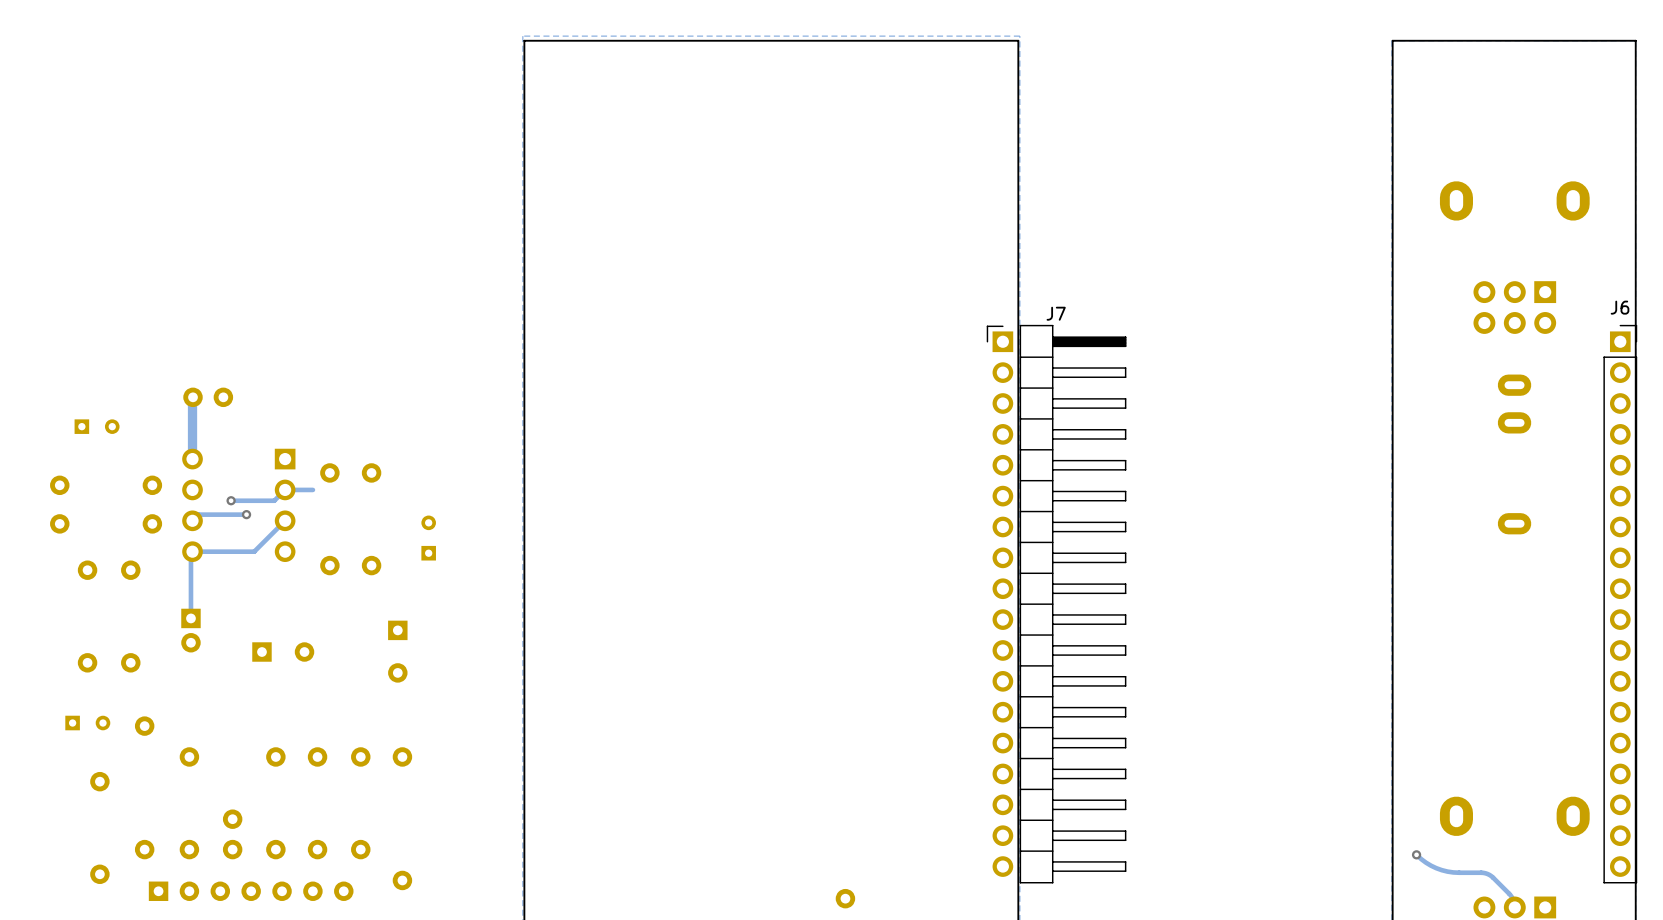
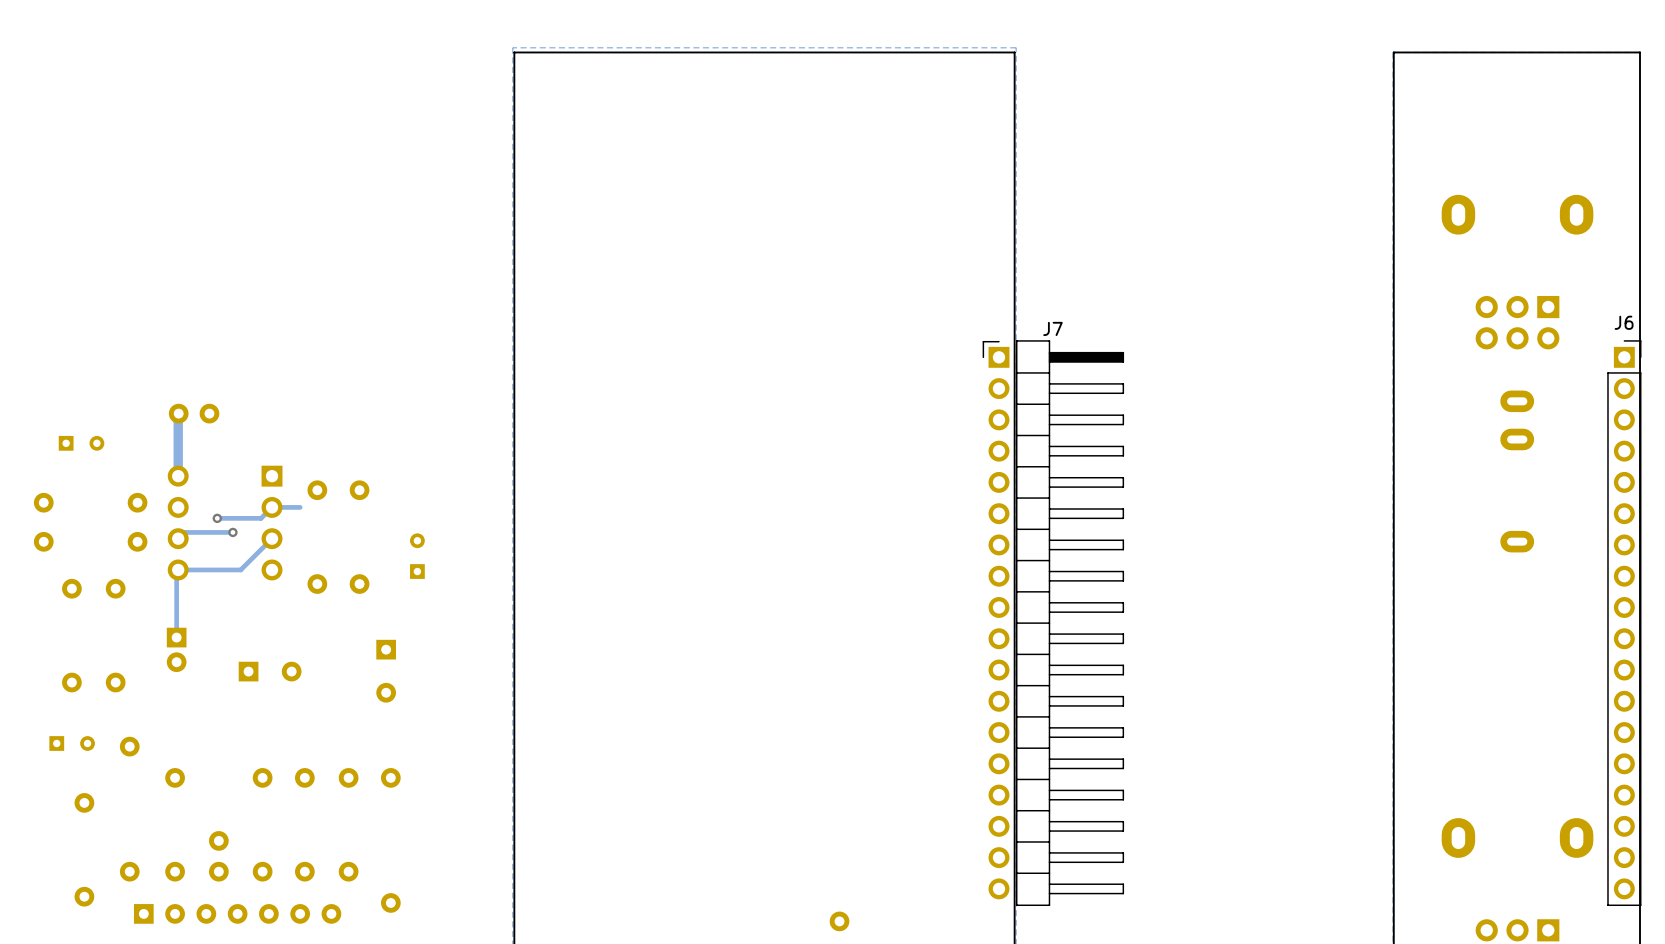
track: (1416, 854) (1426, 862) (1441, 870) (1489, 875) (1510, 895) (1514, 907) -> none
via: (1416, 854) -> none

